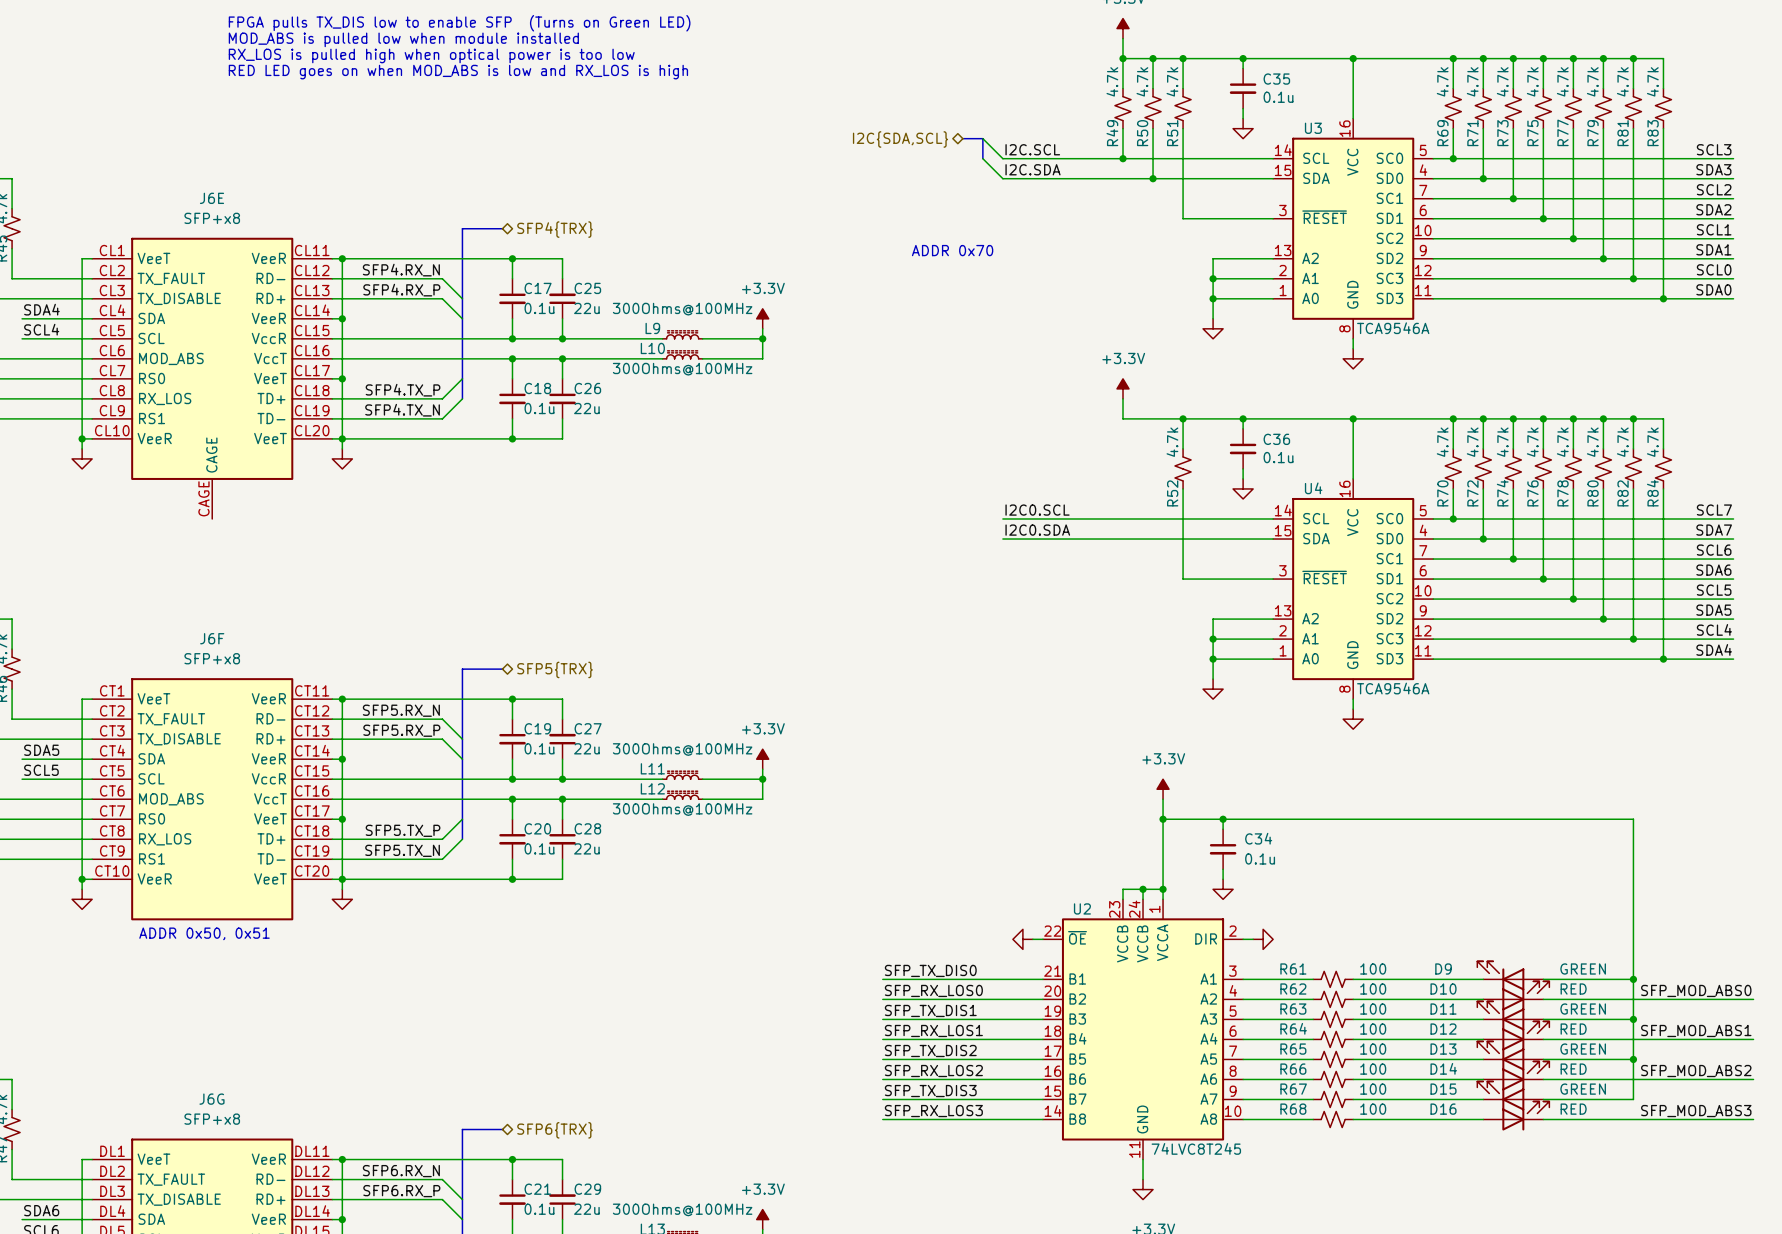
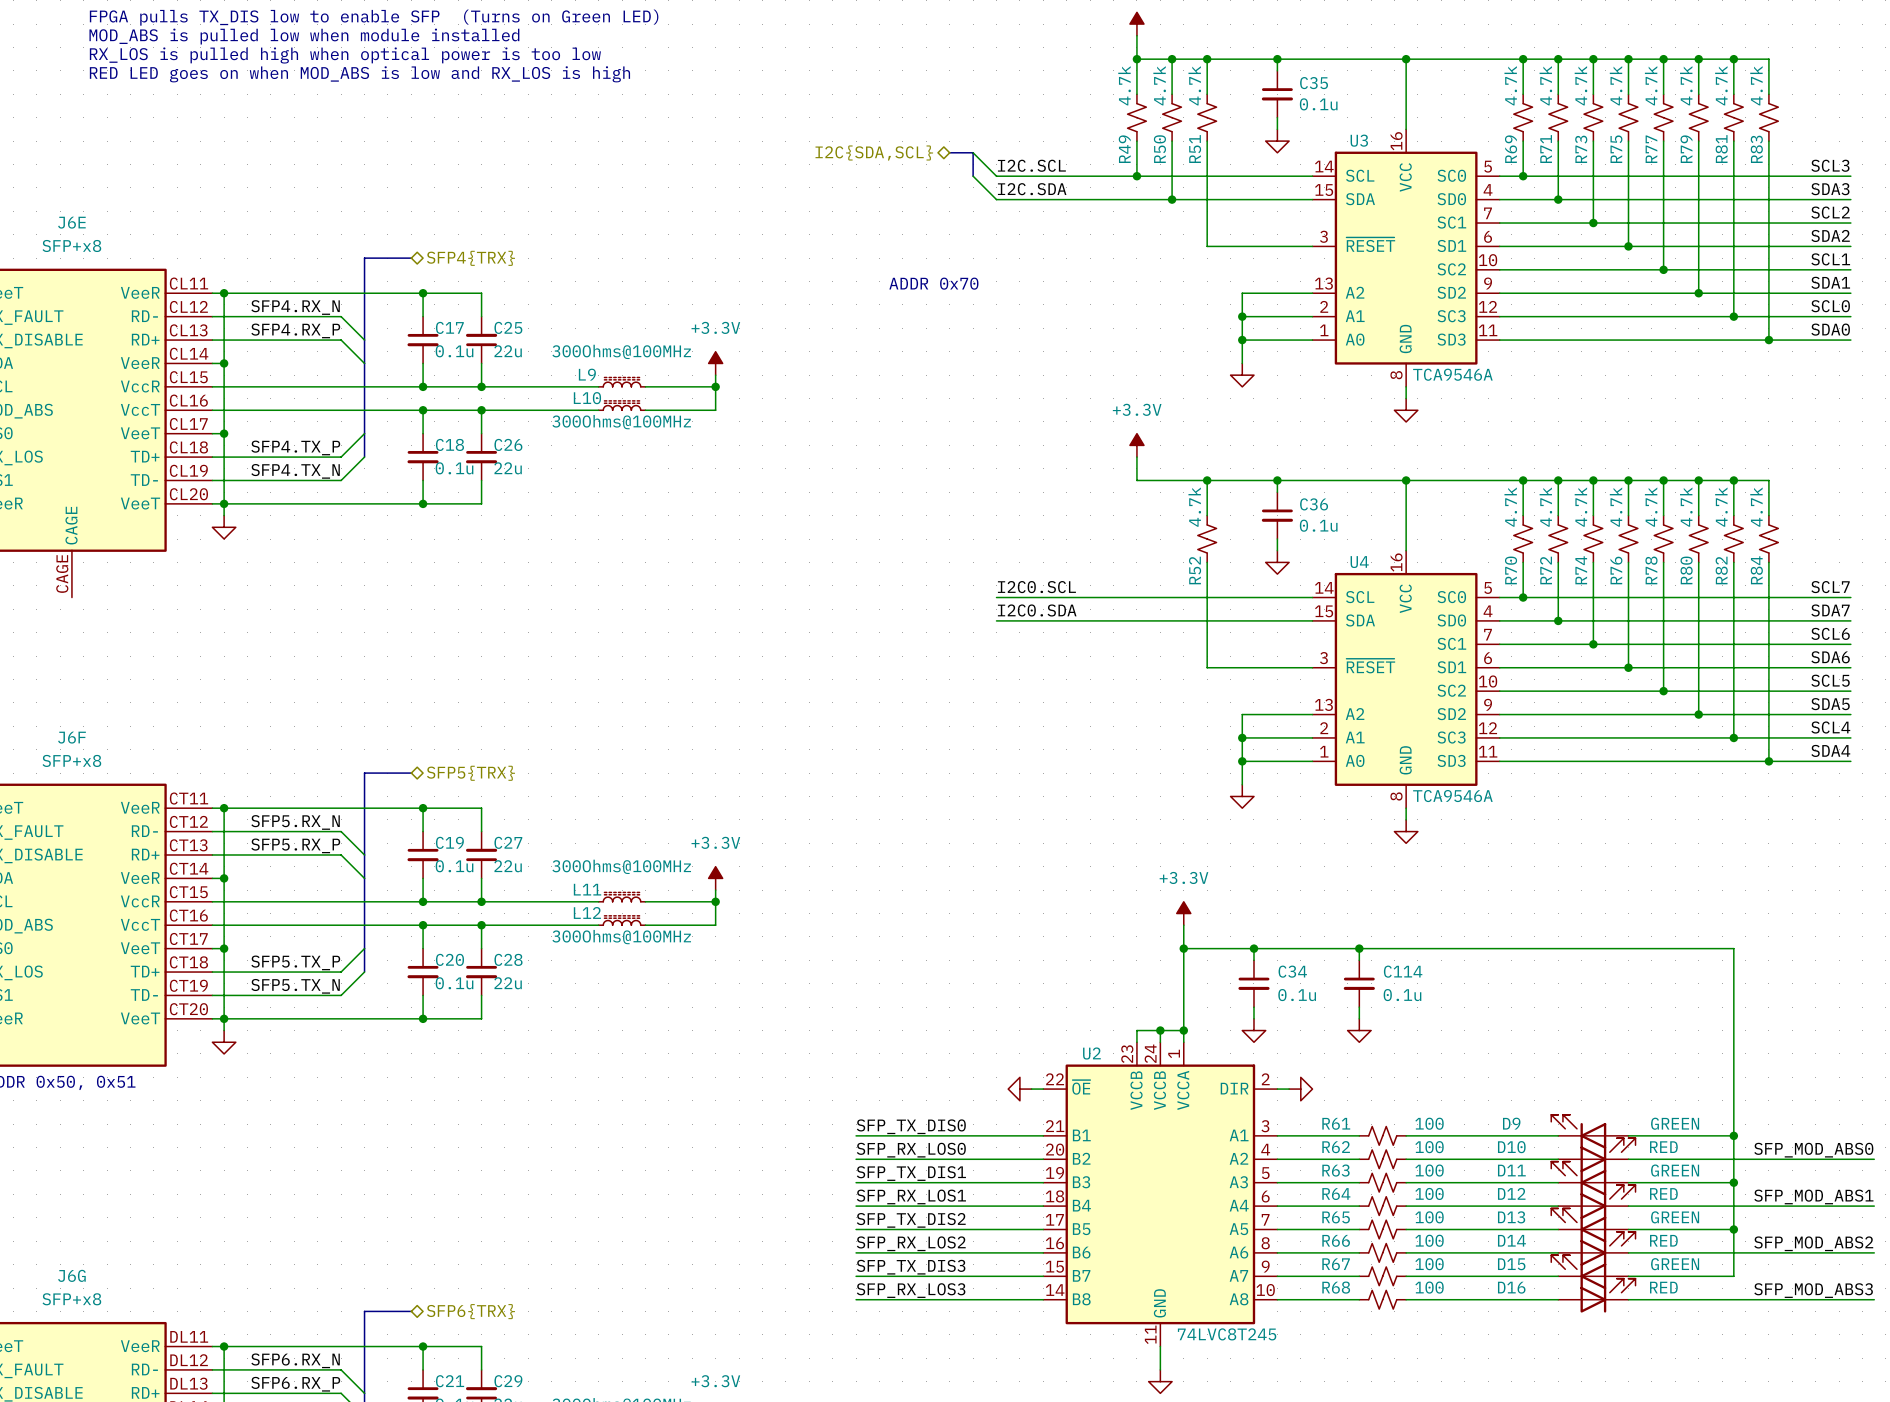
wire: none -> (1359, 948) (1359, 960)
junction: none -> (1359, 948)
C114: none -> 0.1u (1359, 983)
wire: none -> (1359, 1007) (1359, 1018)
power symbol: none -> (1359, 1030)

